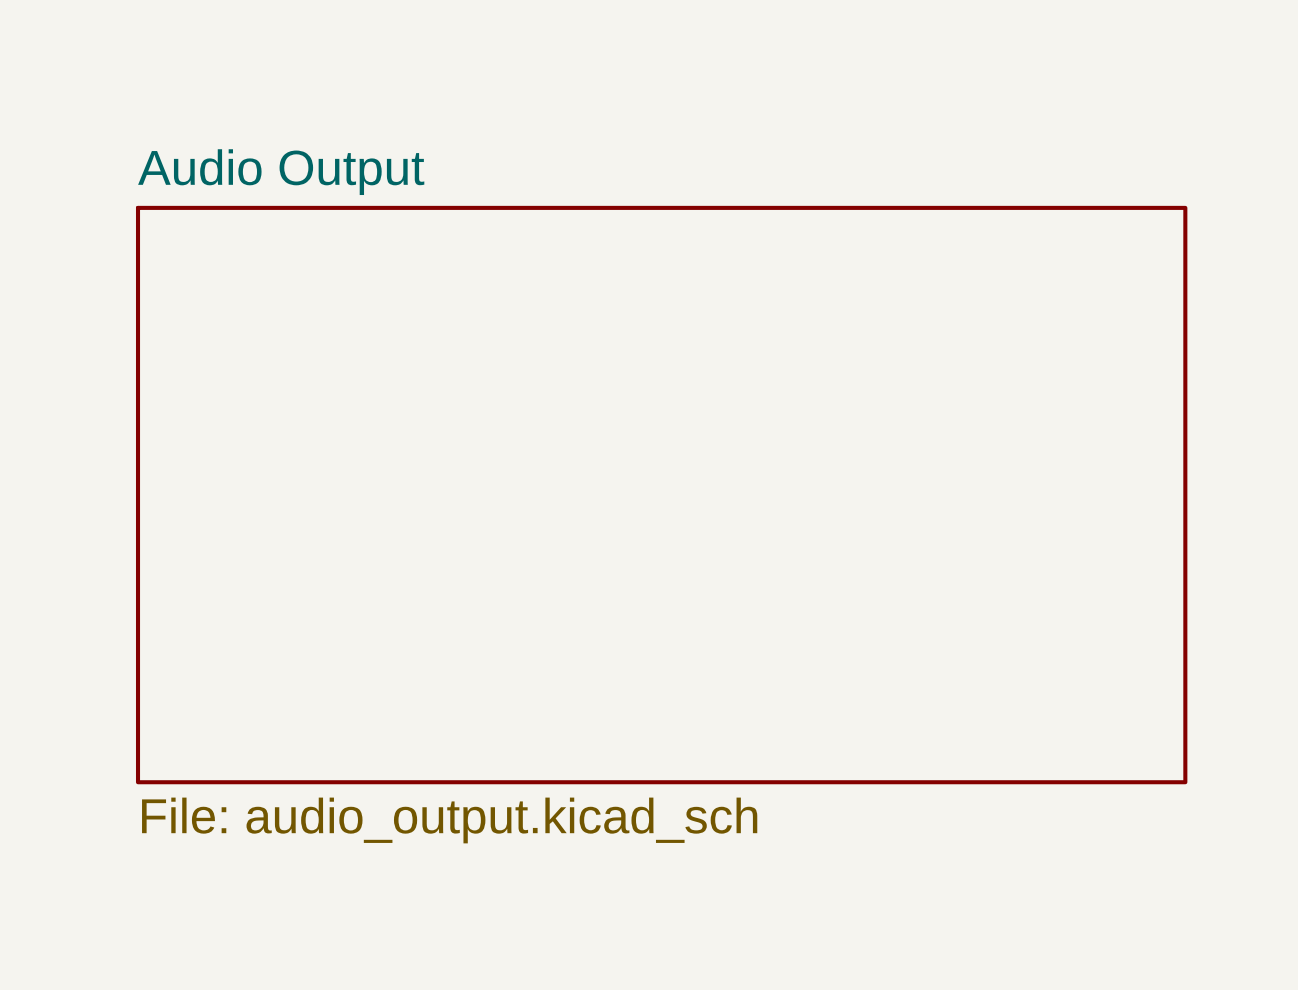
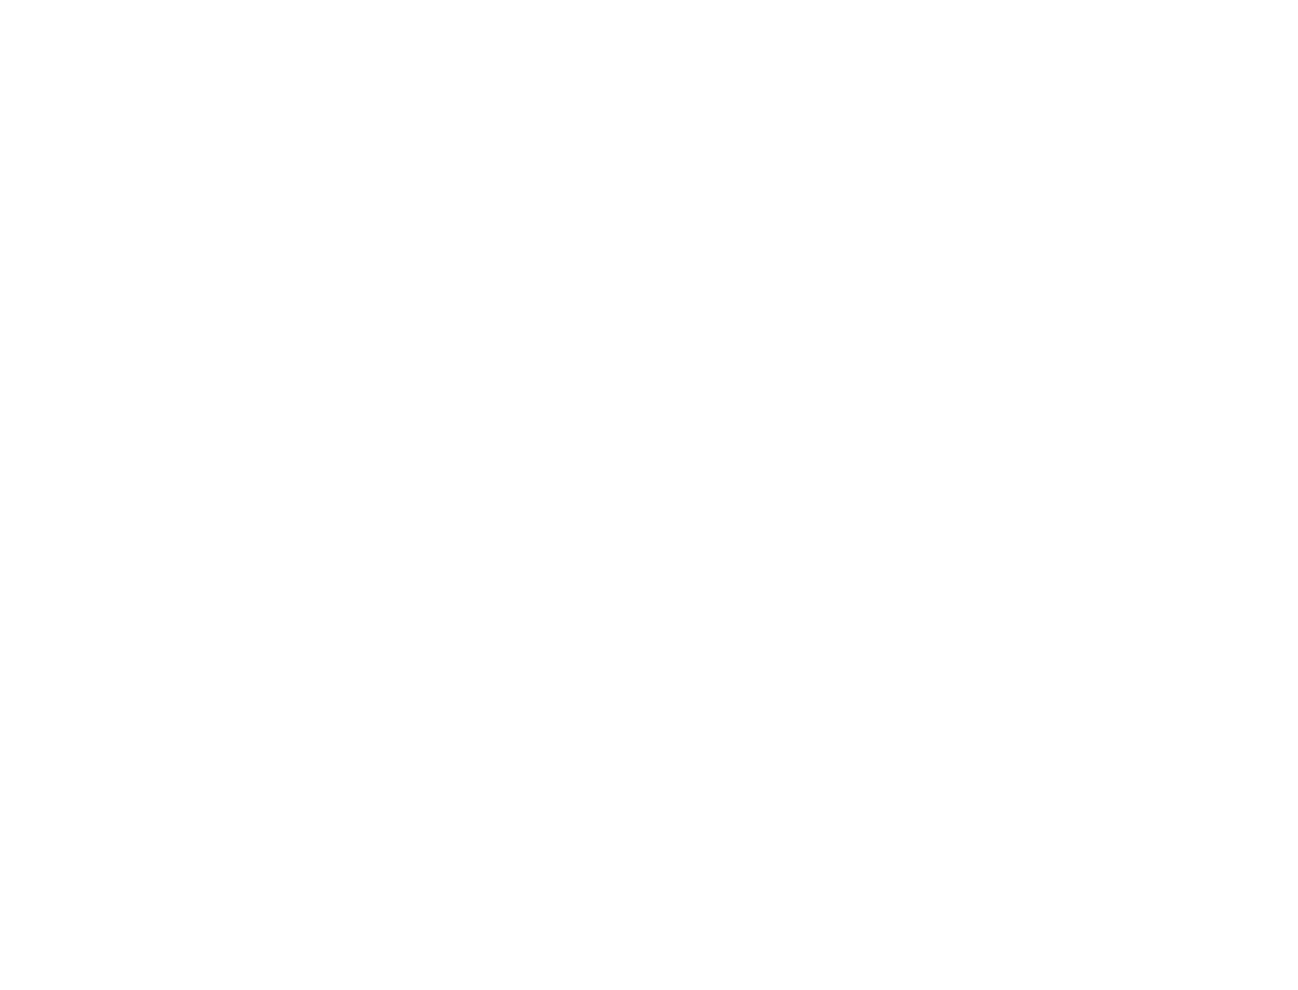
sheet Audio Output: File: audio_output.kicad_sch (661, 495) -> none

